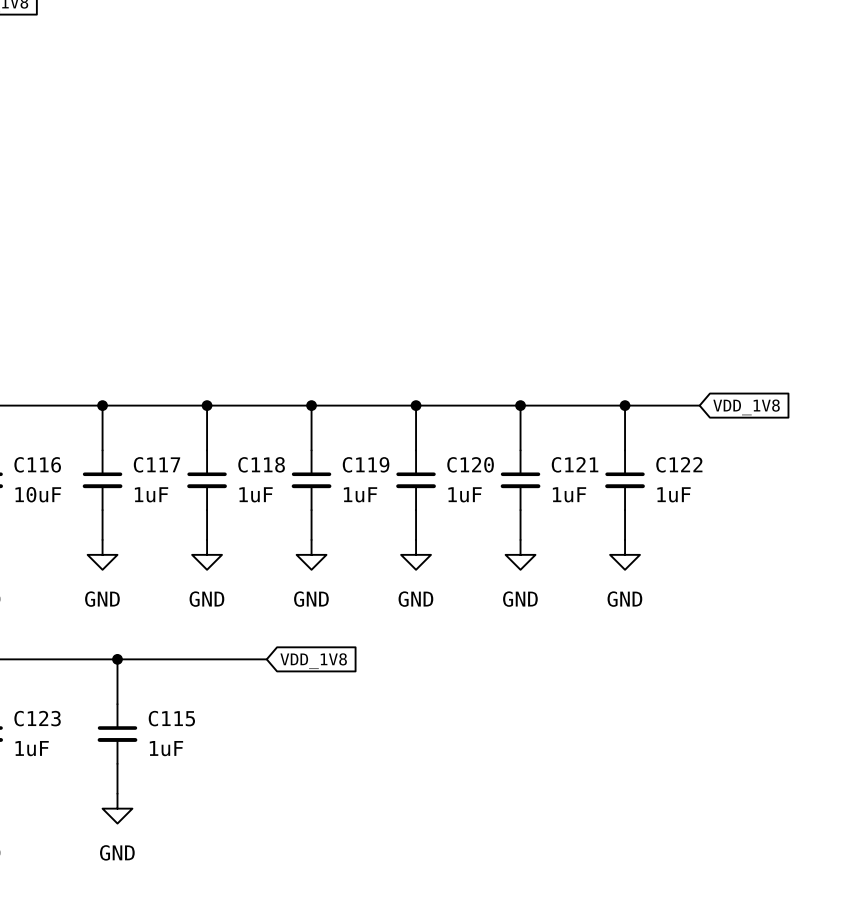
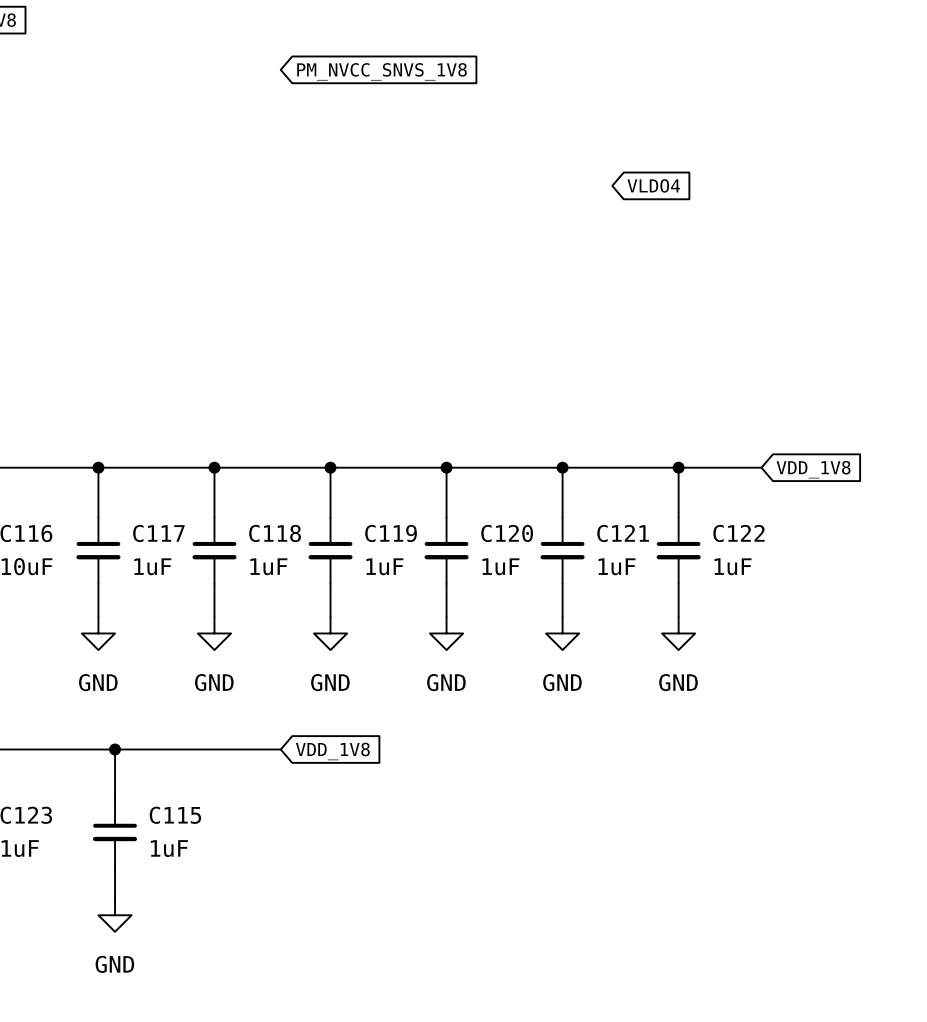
global label: none -> PM_NVCC_SNVS_1V8 (381, 71)
global label: none -> VLDO4 (653, 185)

